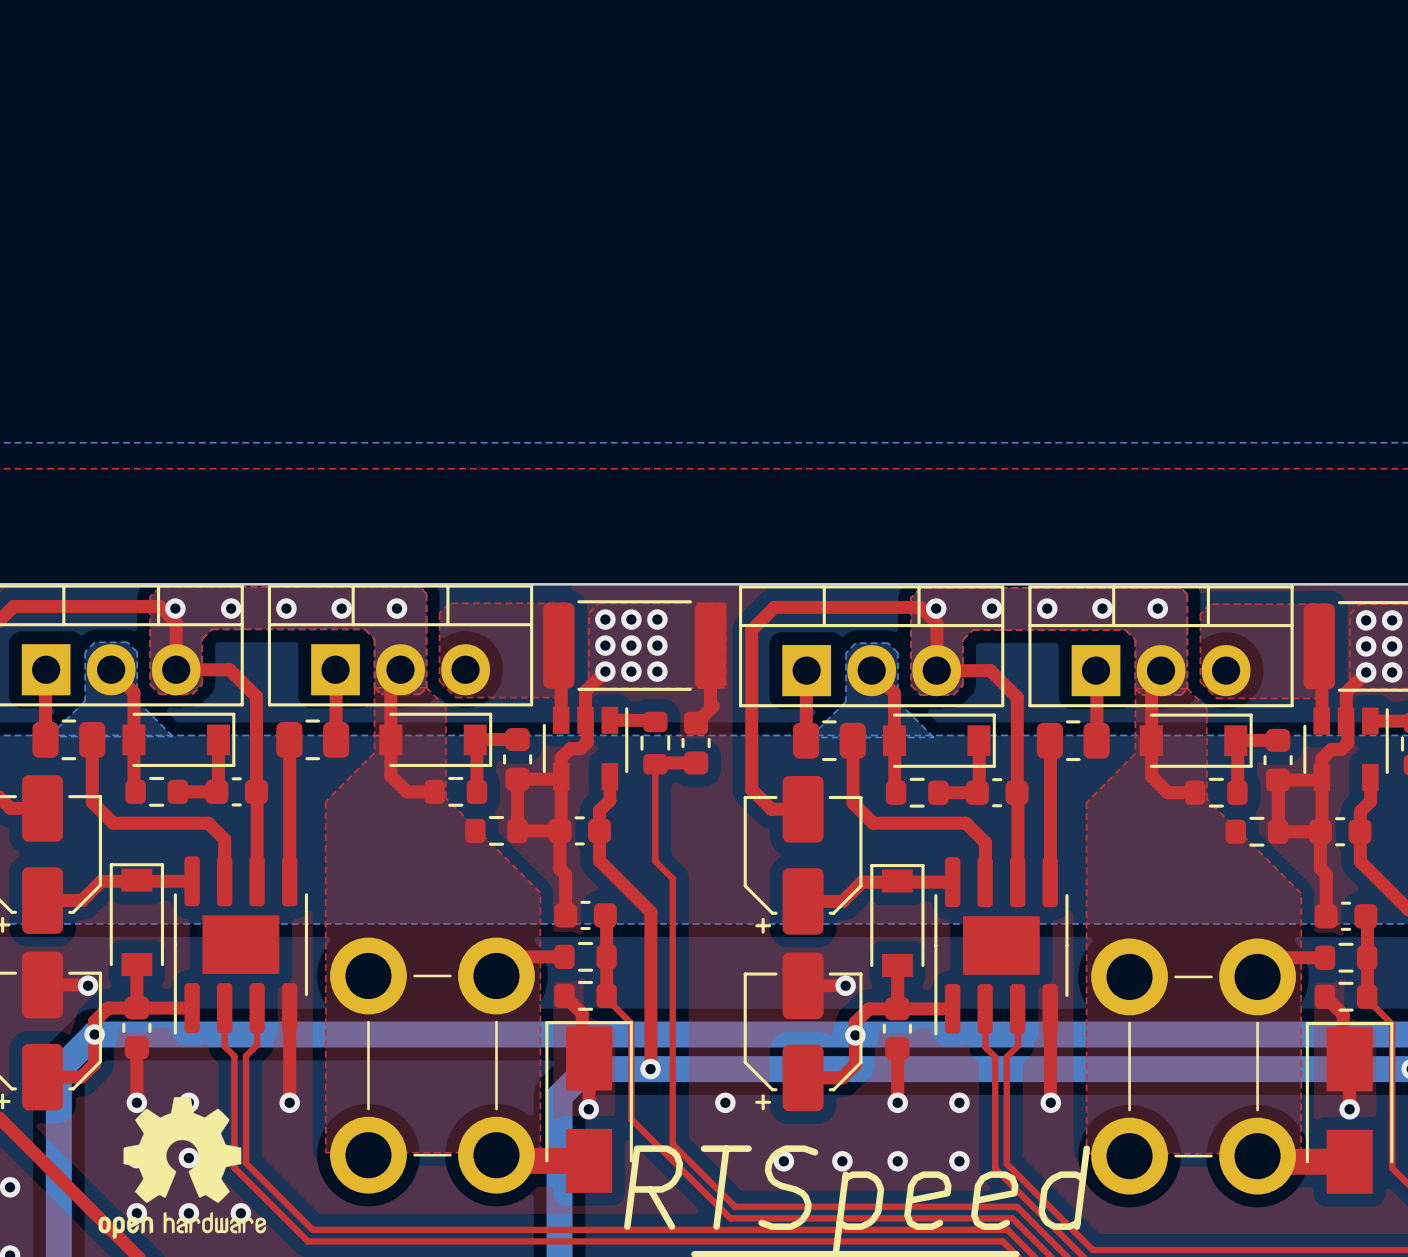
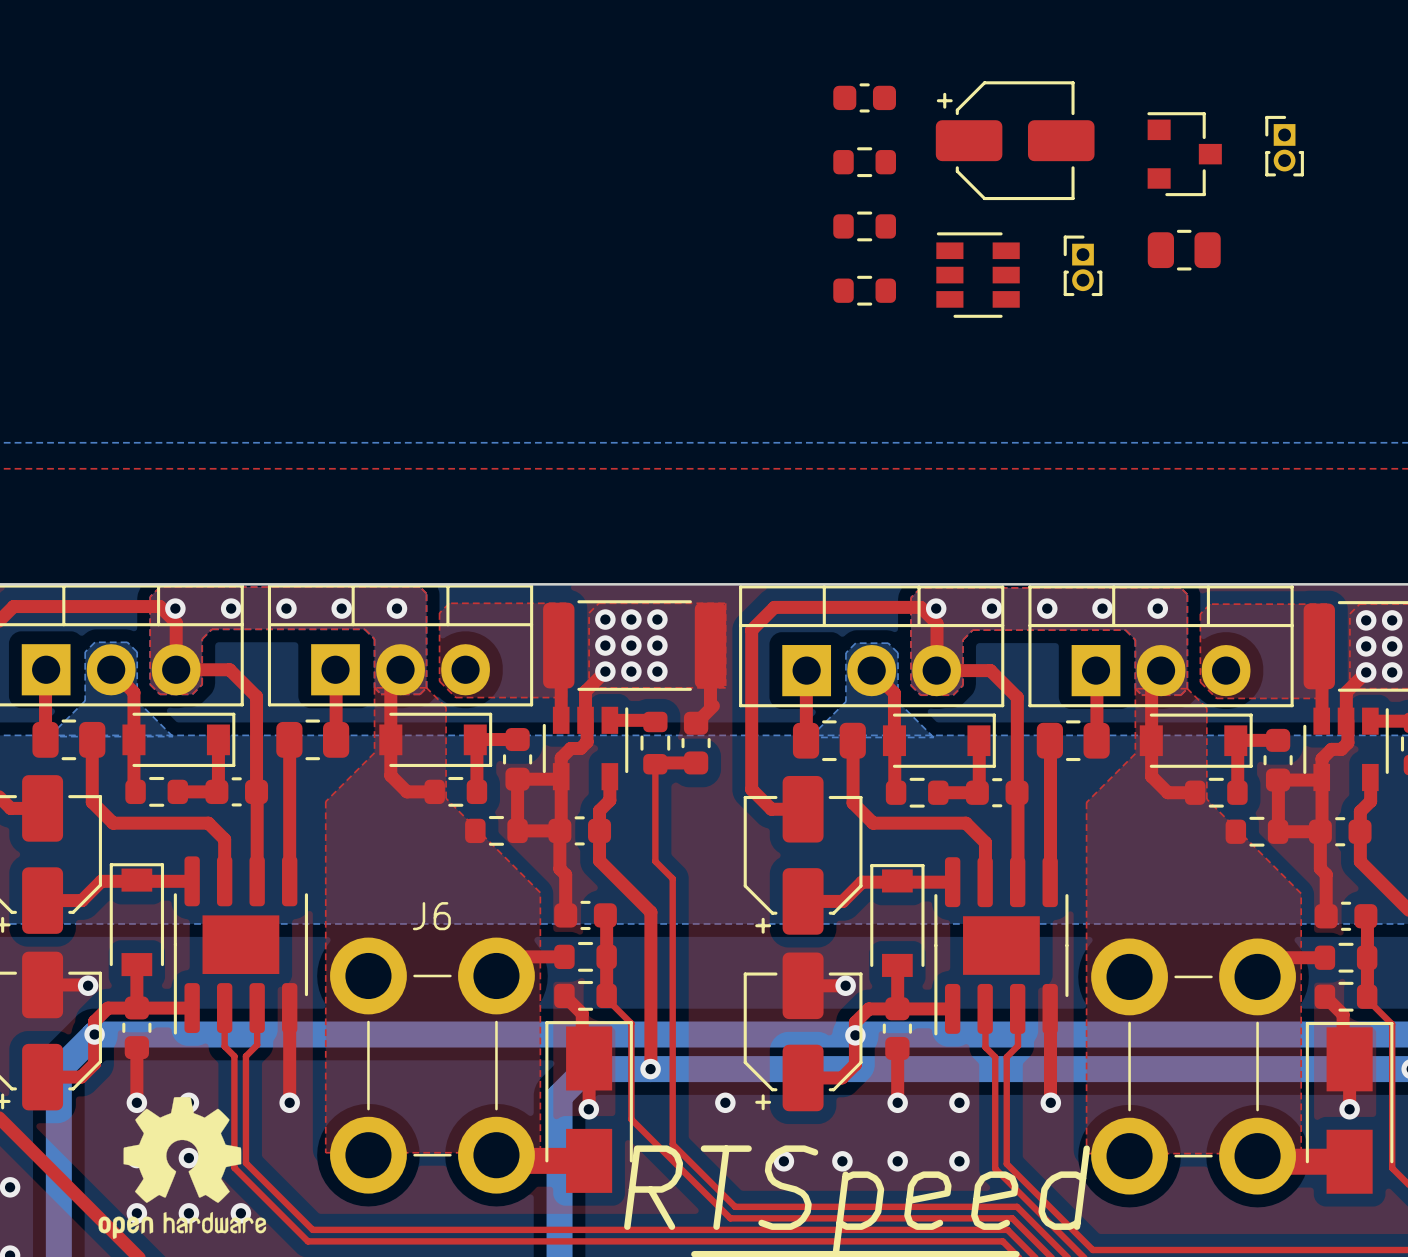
part: none -> (864, 97)
part: none -> (1015, 140)
part: none -> (1284, 146)
part: none -> (1184, 154)
part: none -> (864, 162)
part: none -> (864, 226)
part: none -> (1184, 250)
part: none -> (1083, 265)
part: none -> (978, 275)
part: none -> (864, 290)
J6 name: none -> J6 (431, 916)

